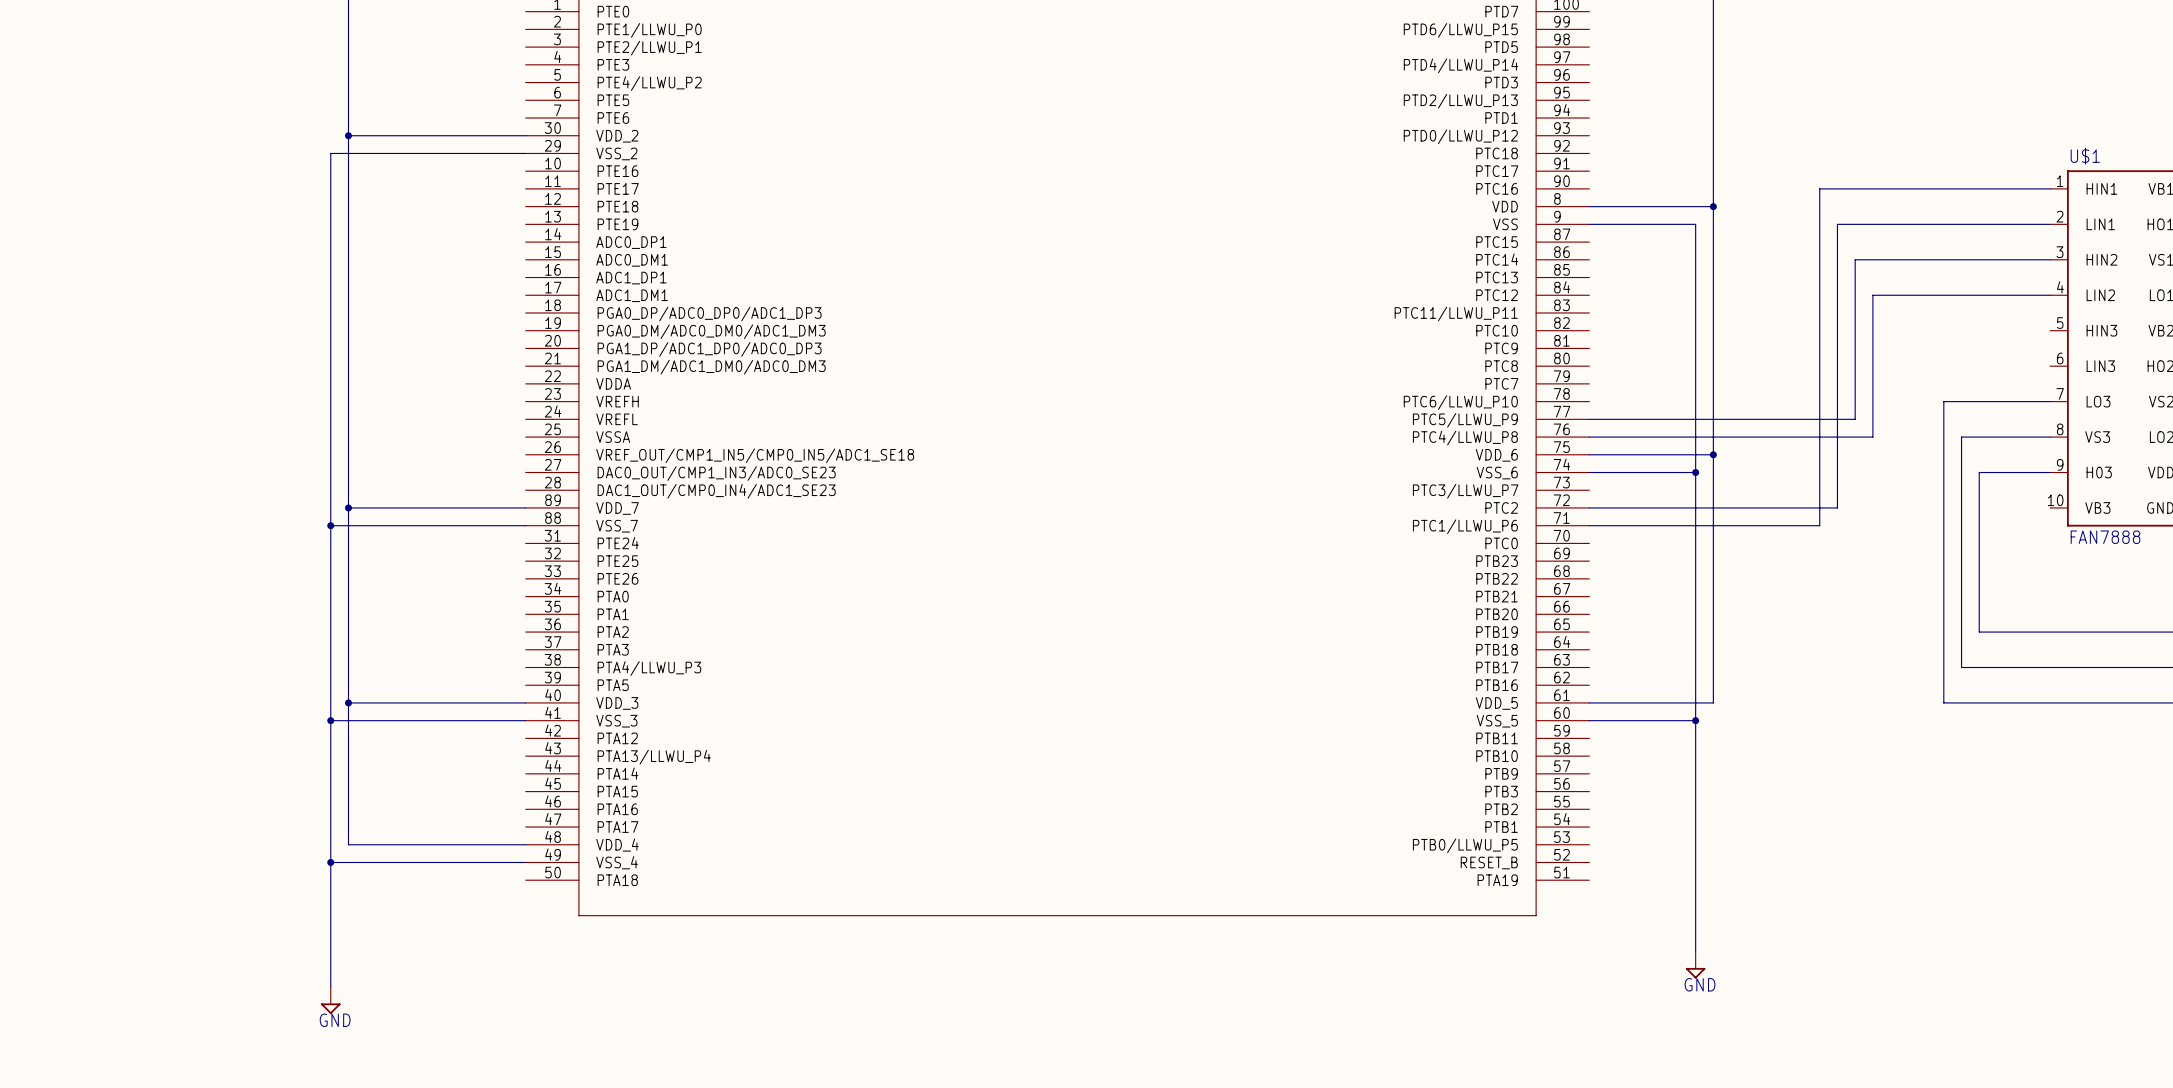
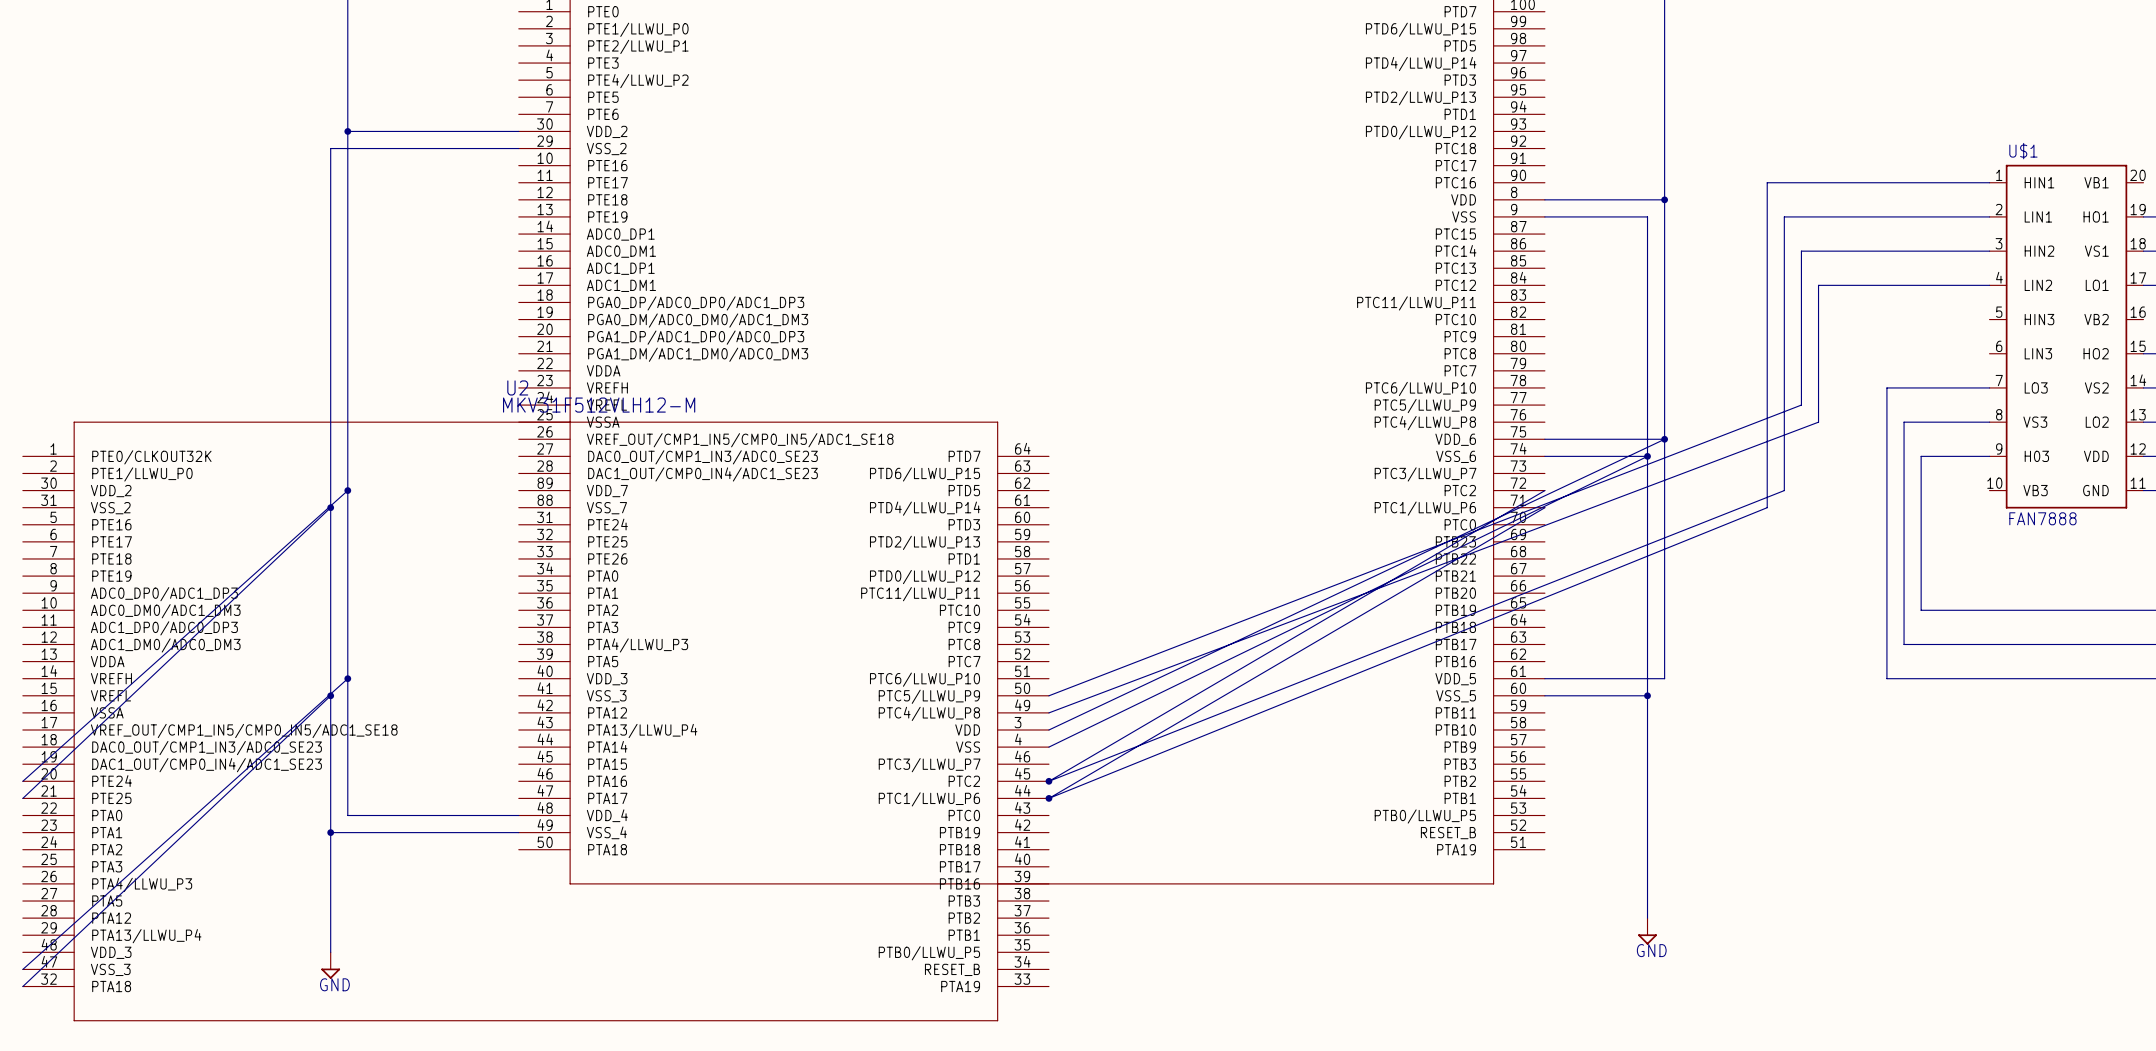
wire: (1589, 419) (1855, 419) -> (1048, 695) (1801, 405)
wire: (1589, 437) (1872, 437) -> (1048, 712) (1818, 422)
wire: none -> (1664, 439) (1048, 729)
wire: none -> (1647, 456) (1048, 747)
wire: (348, 507) (525, 507) -> (347, 490) (22, 781)
wire: (1589, 507) (1837, 507) -> (1544, 490) (1048, 781) (1784, 490)
wire: (330, 525) (525, 525) -> (330, 507) (22, 798)
wire: (1589, 525) (1819, 525) -> (1544, 507) (1048, 798) (1767, 507)
wire: (348, 702) (525, 702) -> (347, 678) (22, 969)
wire: (330, 720) (525, 720) -> (330, 695) (22, 986)
U2: none -> MKV31F512VLH12-M (535, 721)
junction: none -> (1048, 781)
junction: none -> (1048, 798)

